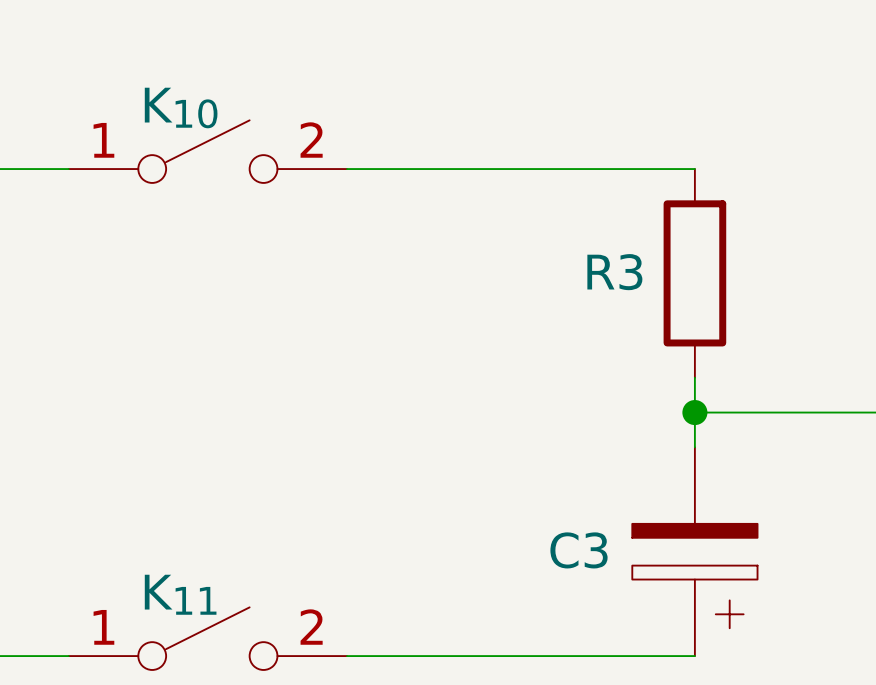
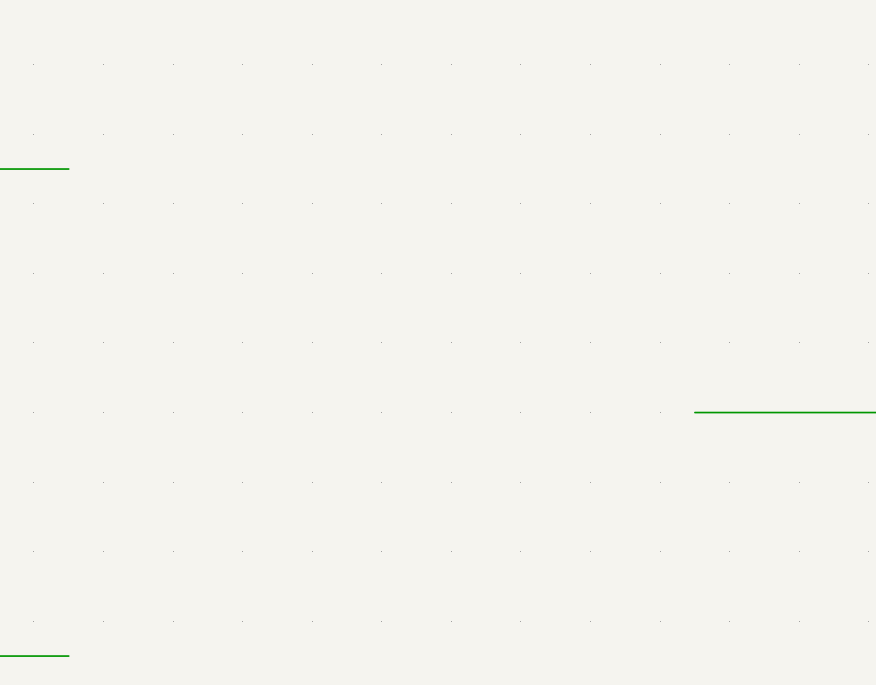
K10: (207, 151) -> none
wire: (347, 169) (694, 169) -> none
R3: (694, 273) -> none
wire: (694, 377) (694, 447) -> none
junction: (694, 412) -> none
C3: (694, 551) -> none
K11: (207, 638) -> none
wire: (347, 656) (694, 656) -> none

